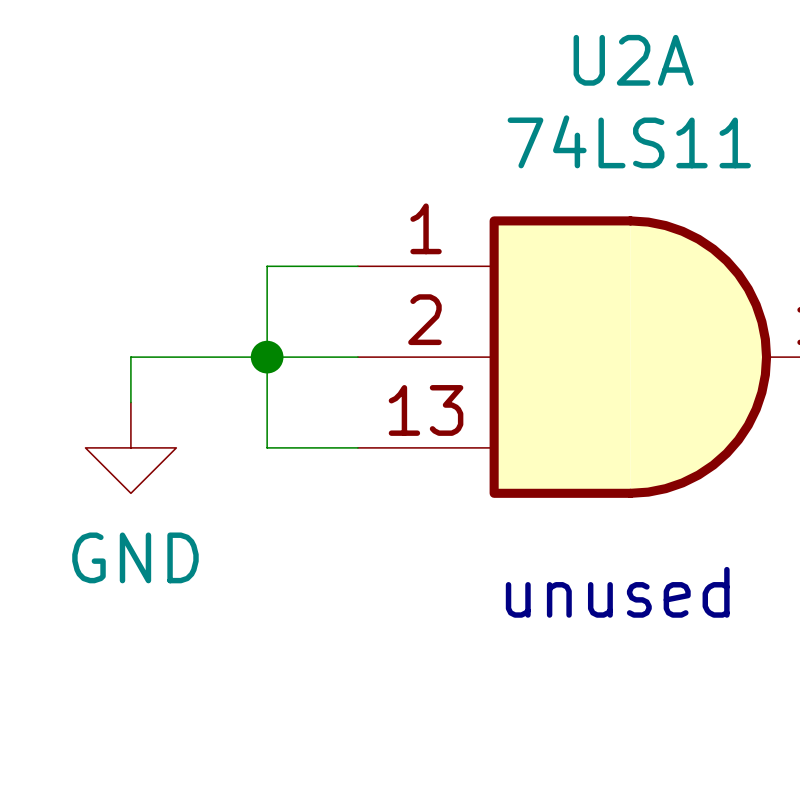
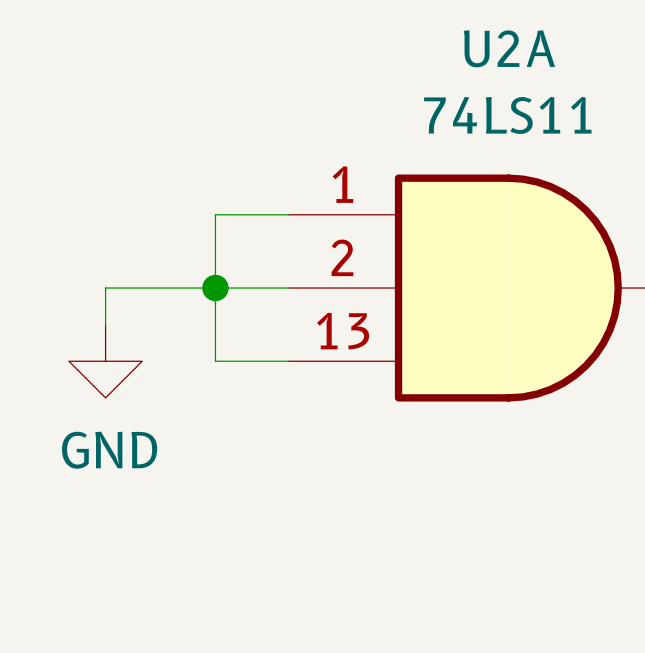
text: unused (617, 592) -> none

